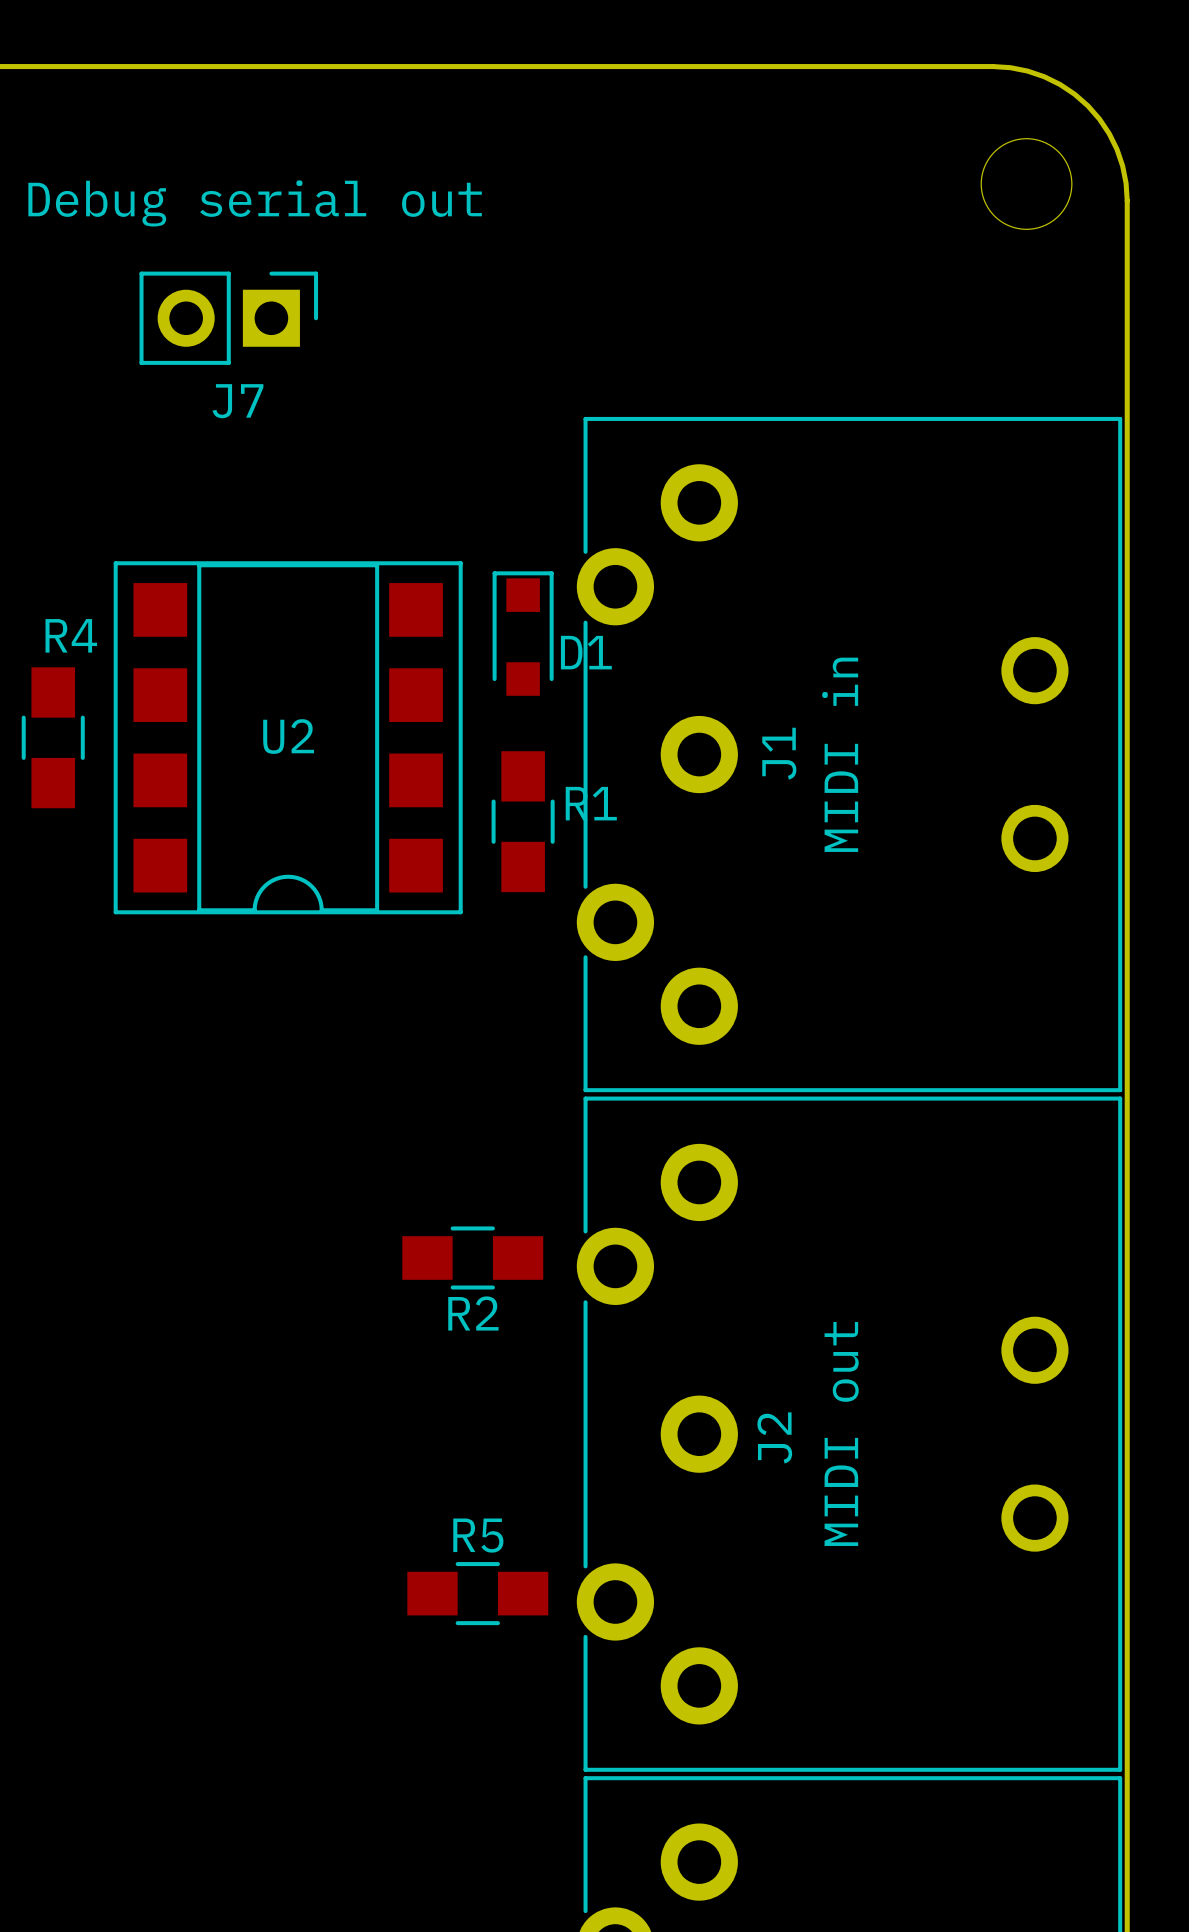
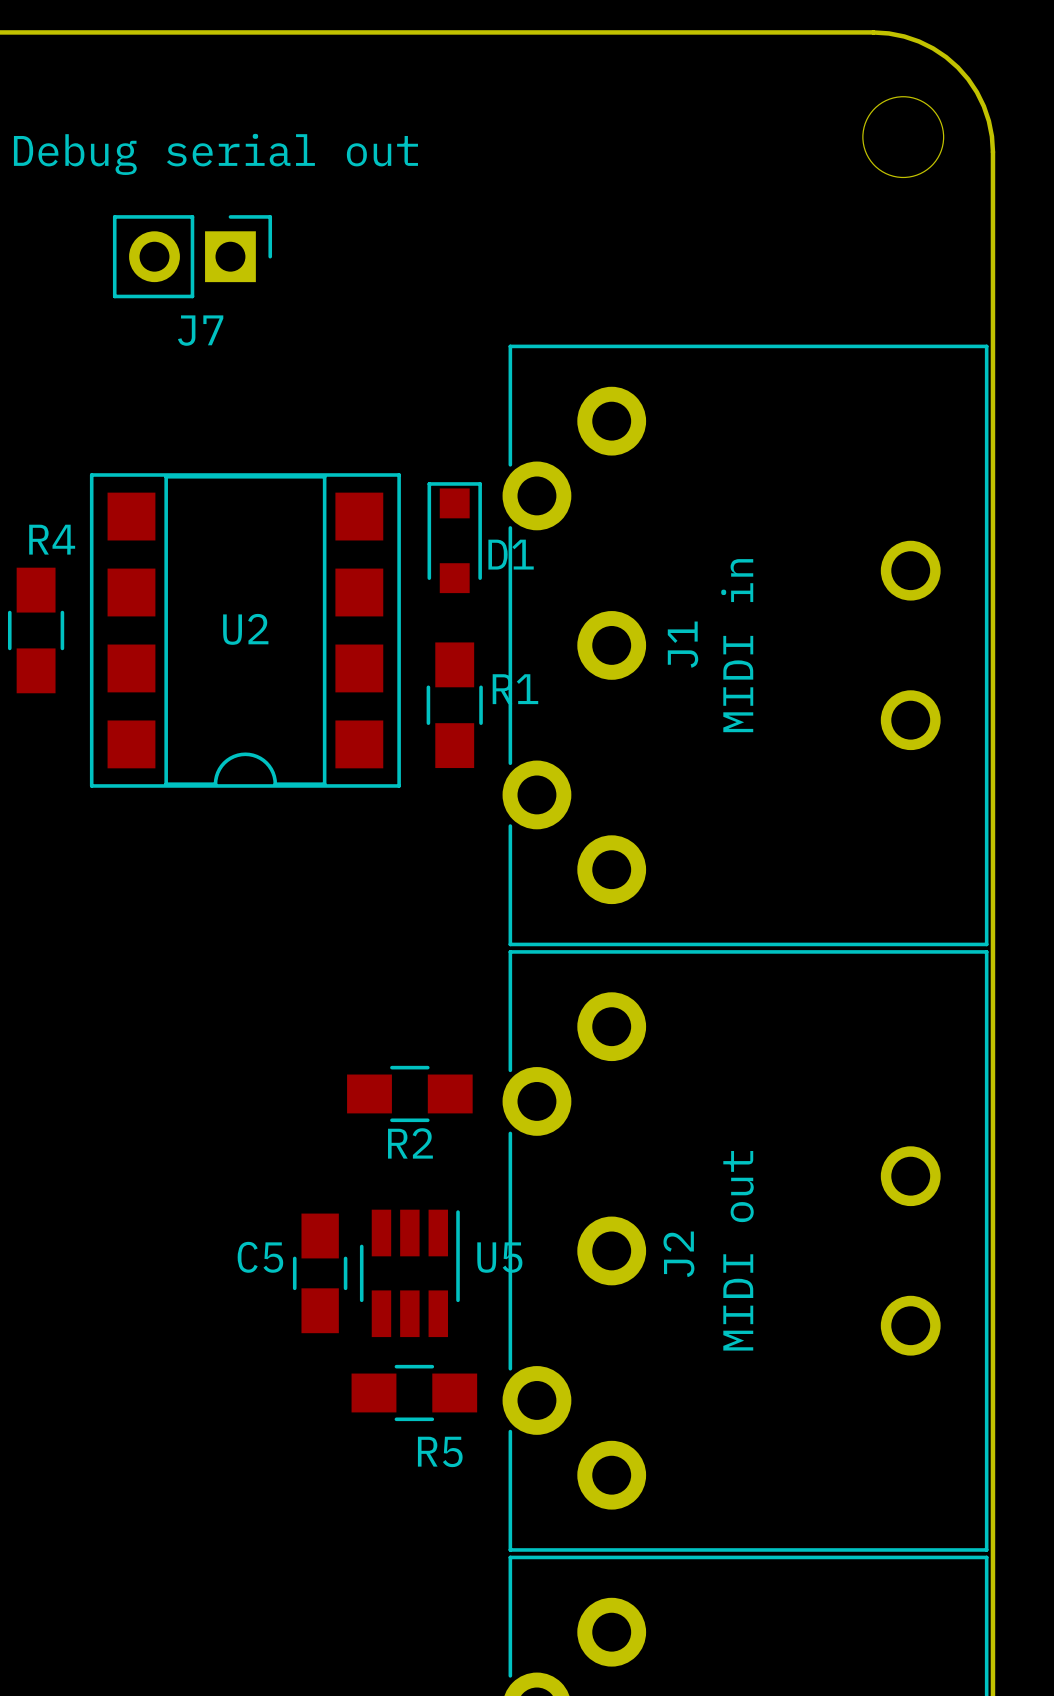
C5: none -> (320, 1273)
U5: none -> (409, 1273)
R5 name position: R5 (478, 1535) -> R5 (440, 1451)

